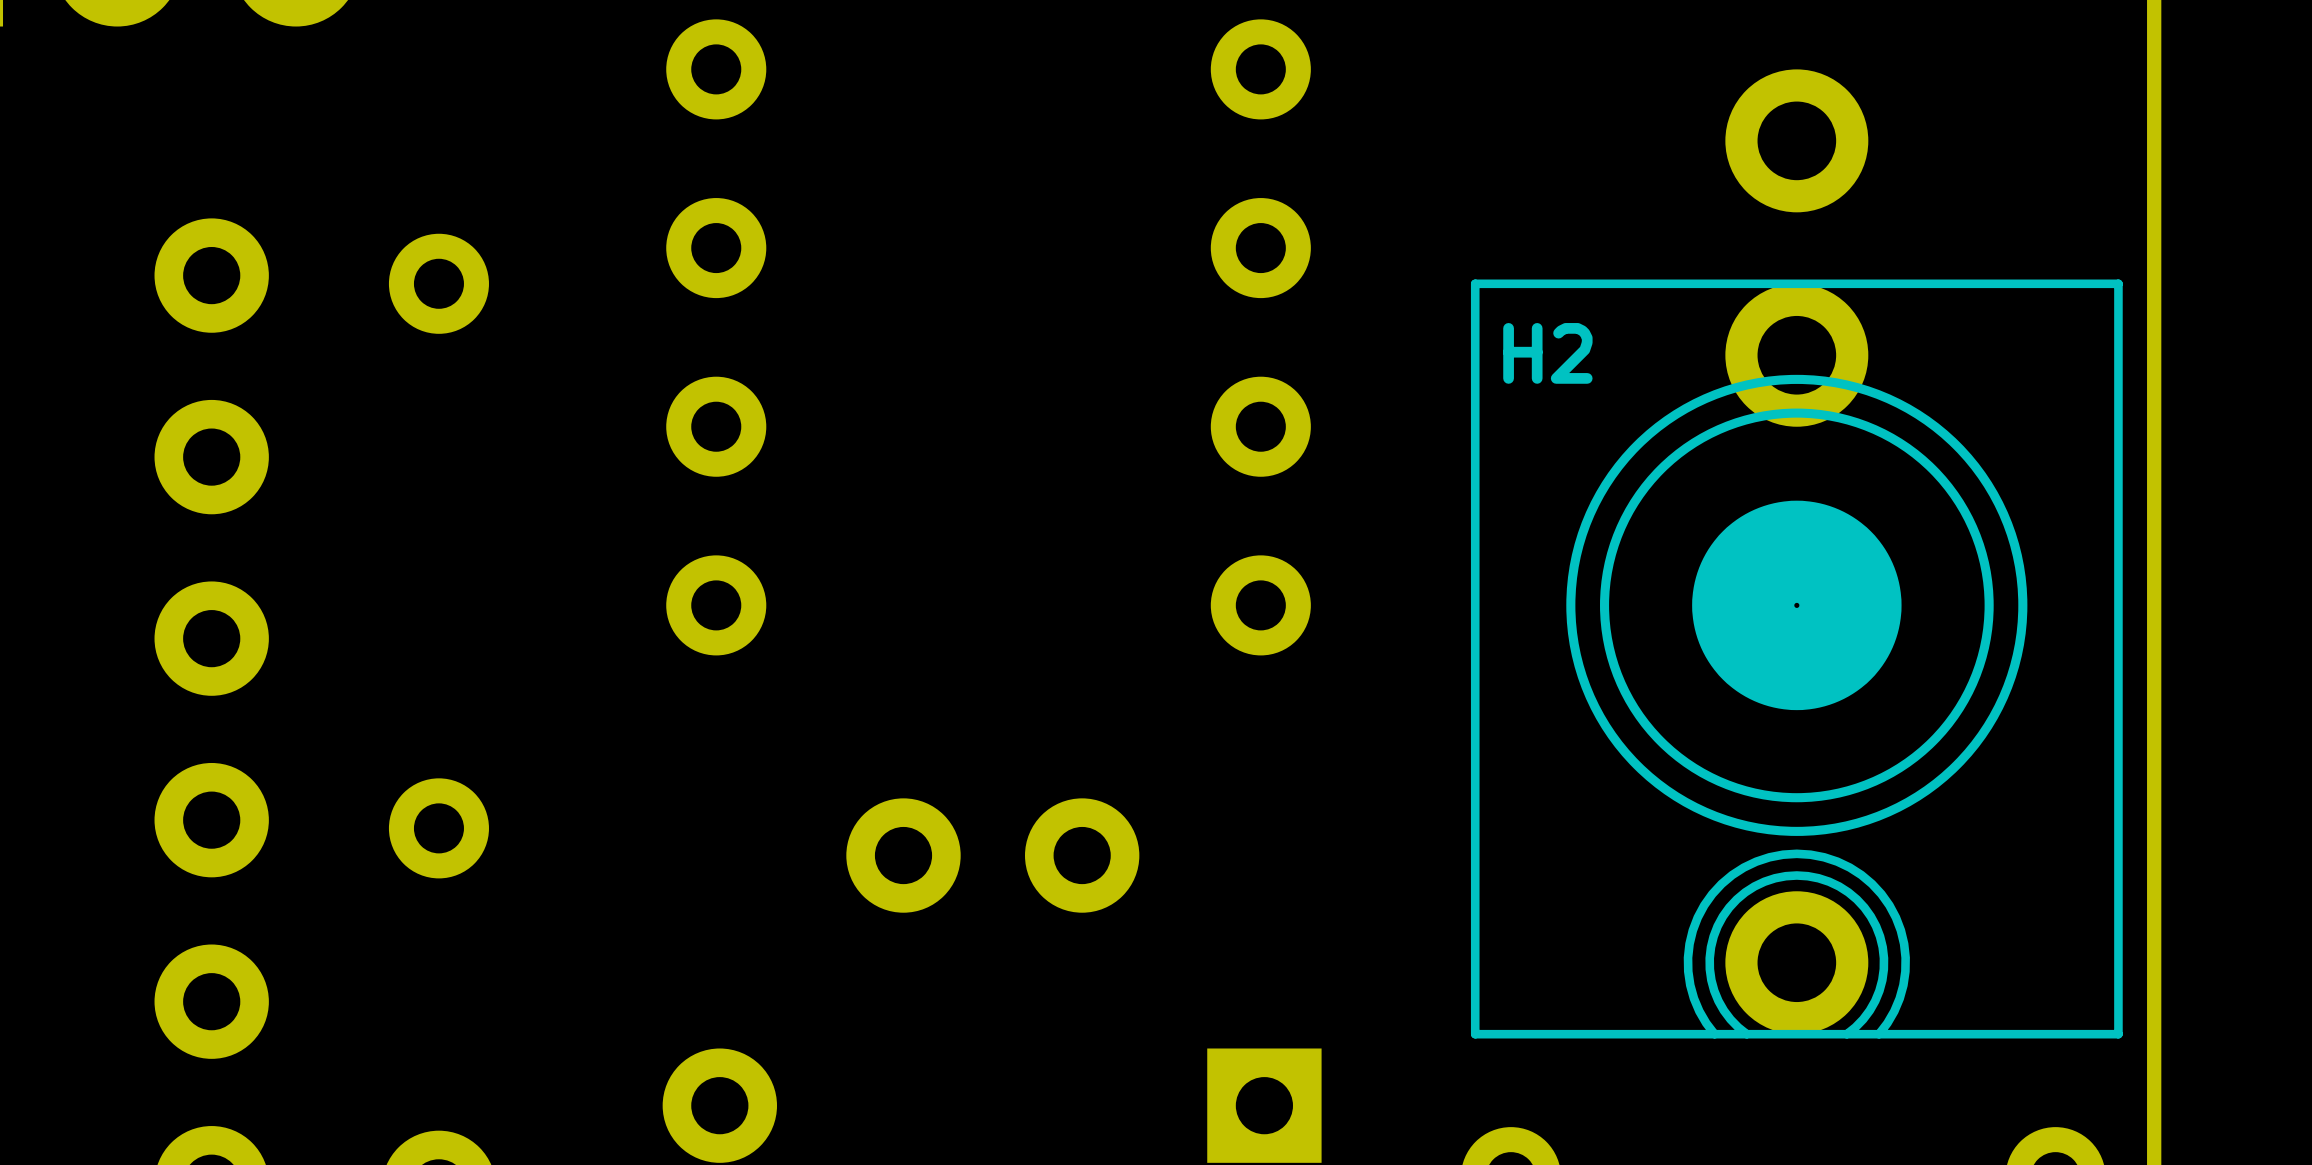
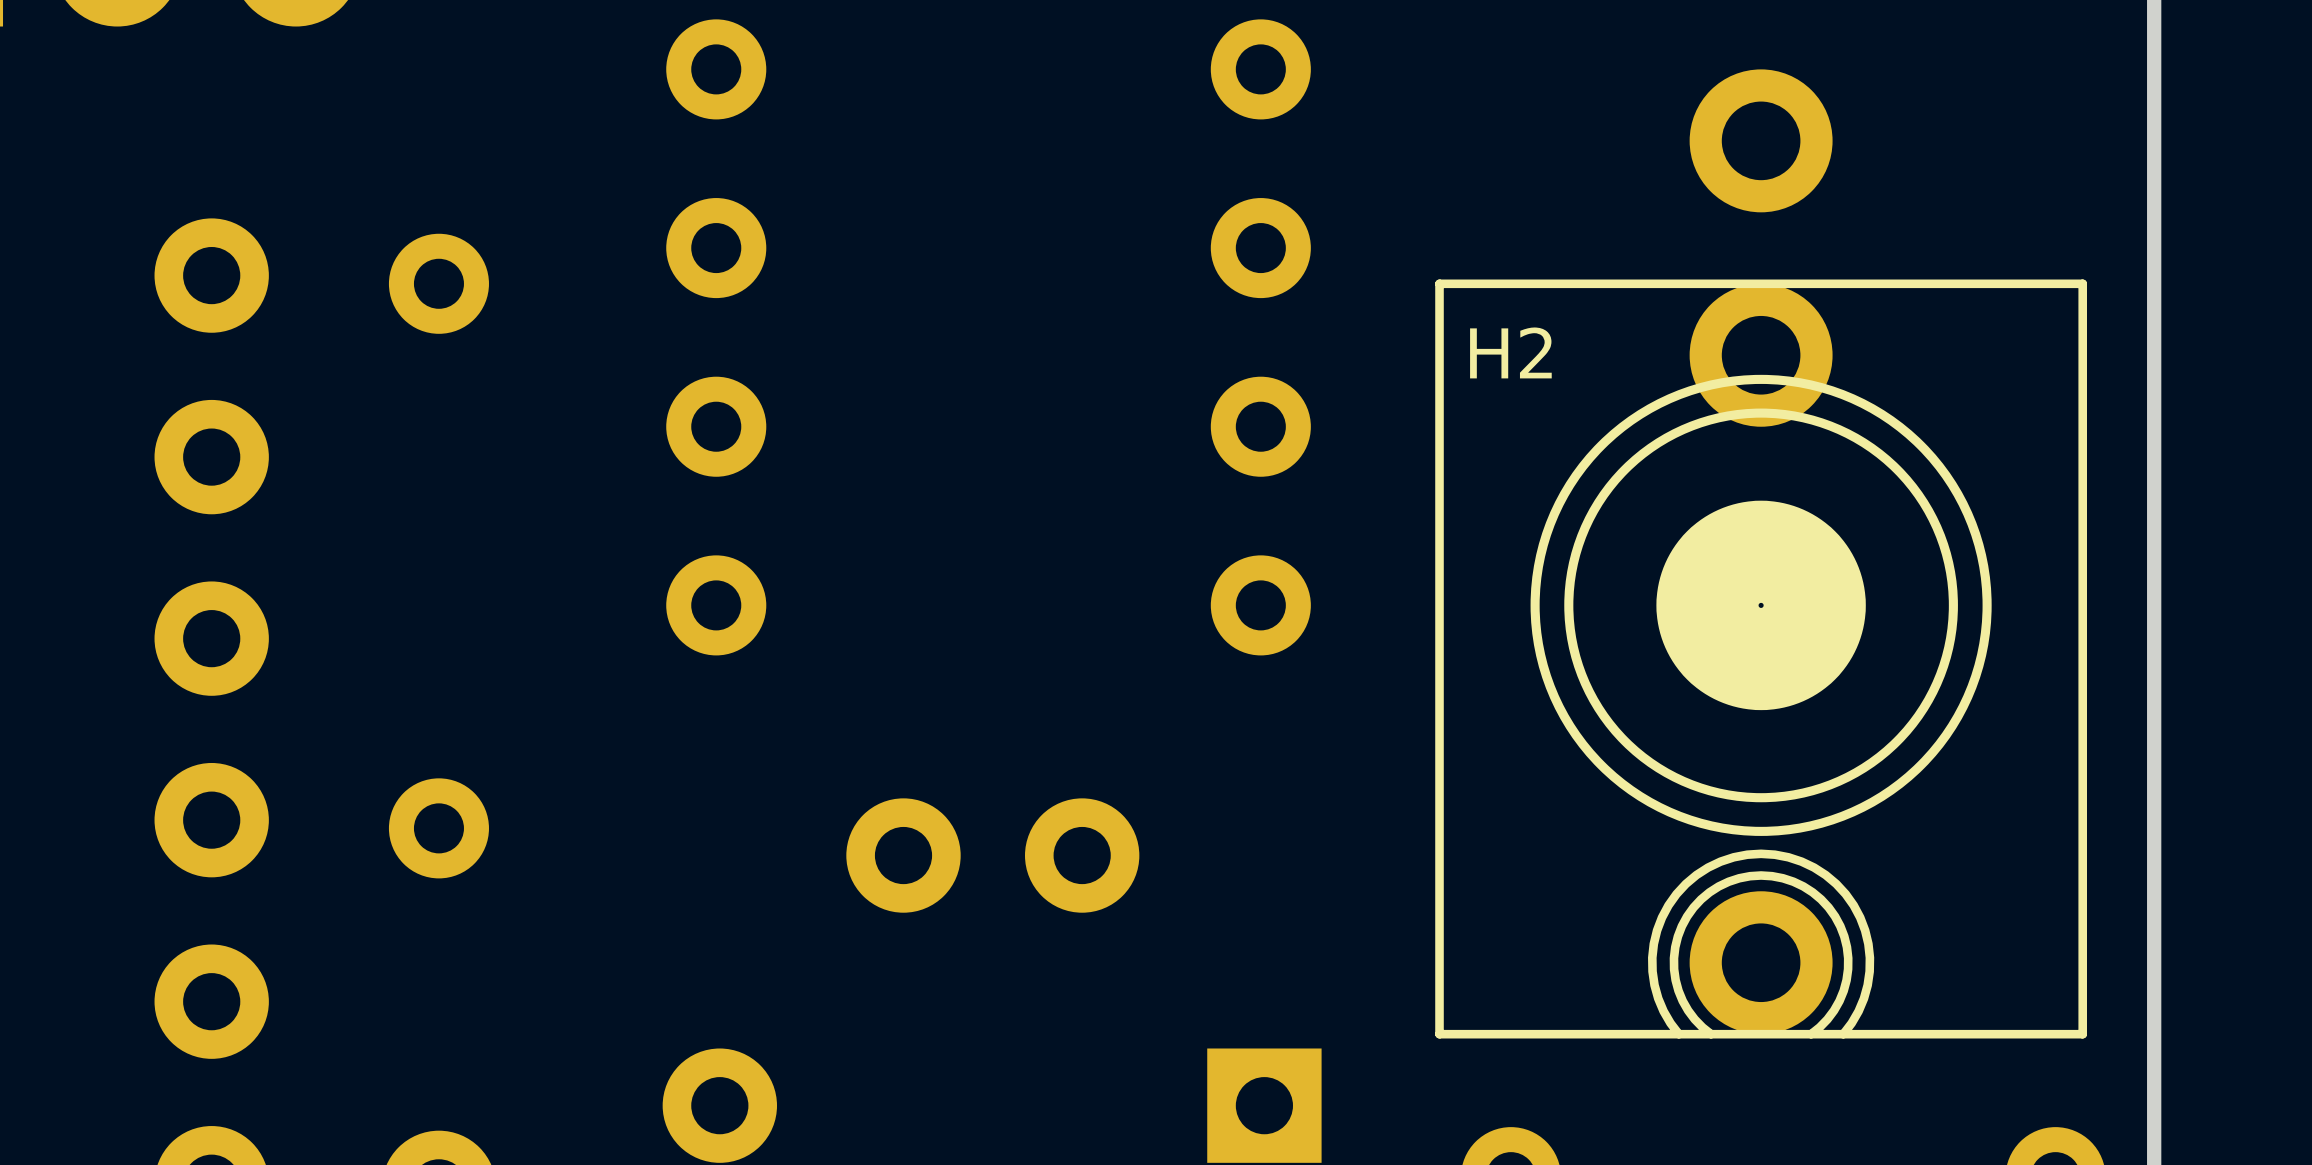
part position: (1796, 553) -> (1761, 553)

